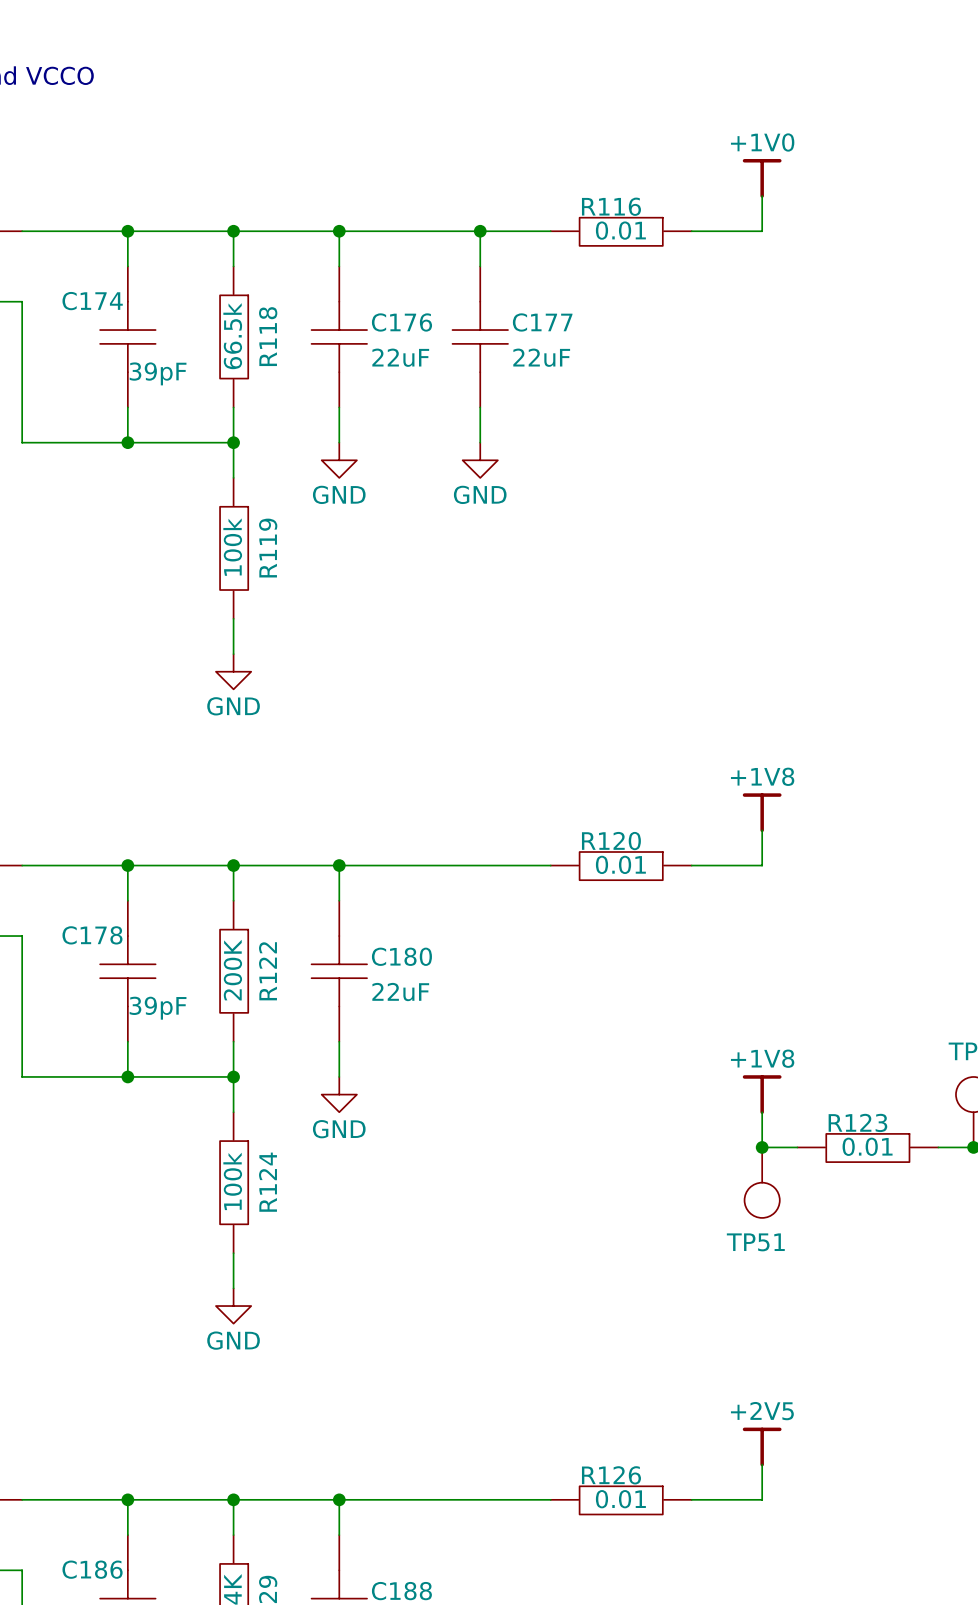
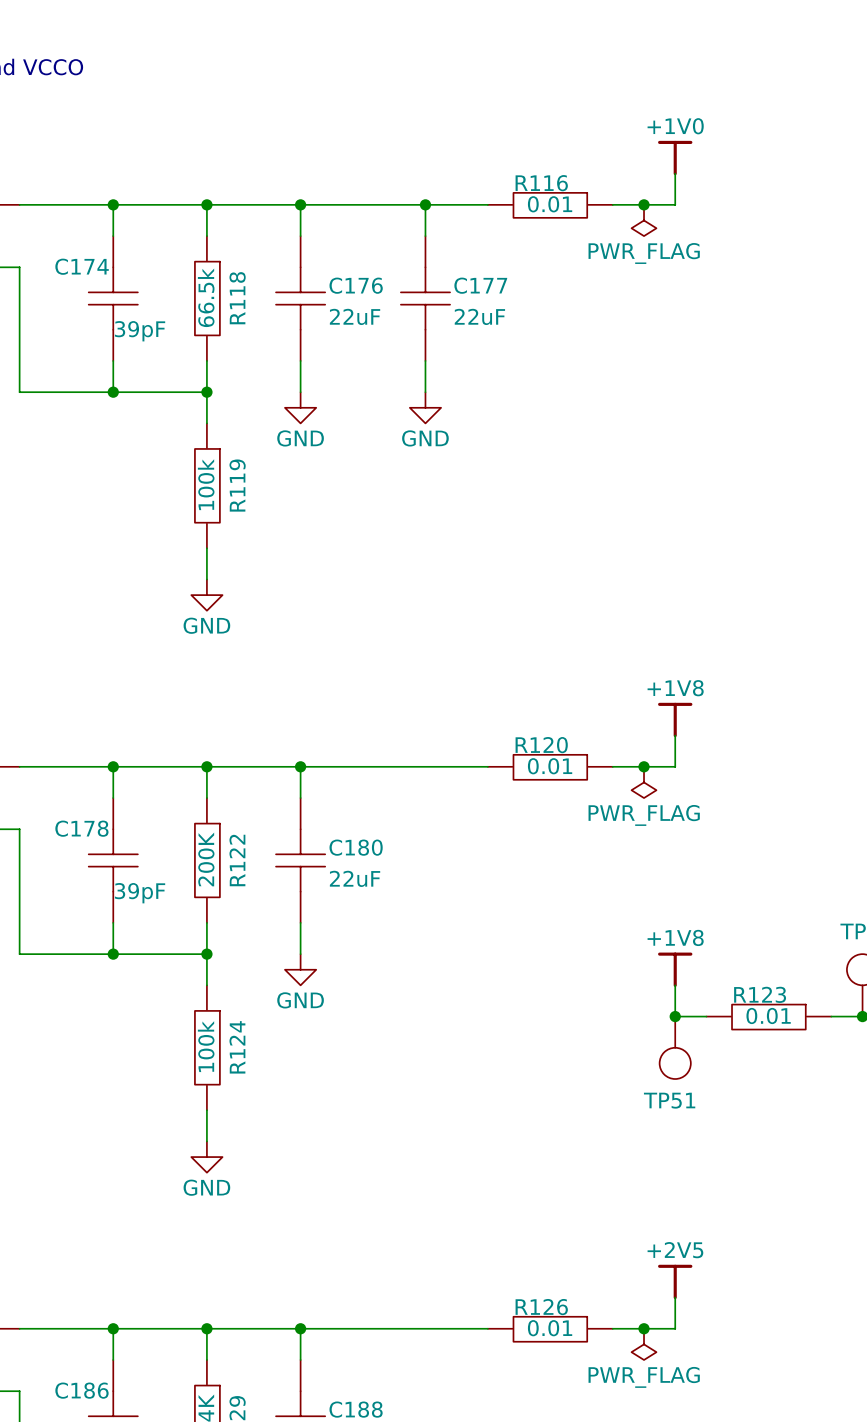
junction: none -> (644, 204)
power symbol: none -> PWR_FLAG (644, 220)
junction: none -> (644, 766)
power symbol: none -> PWR_FLAG (644, 782)
junction: none -> (644, 1328)
power symbol: none -> PWR_FLAG (644, 1344)

